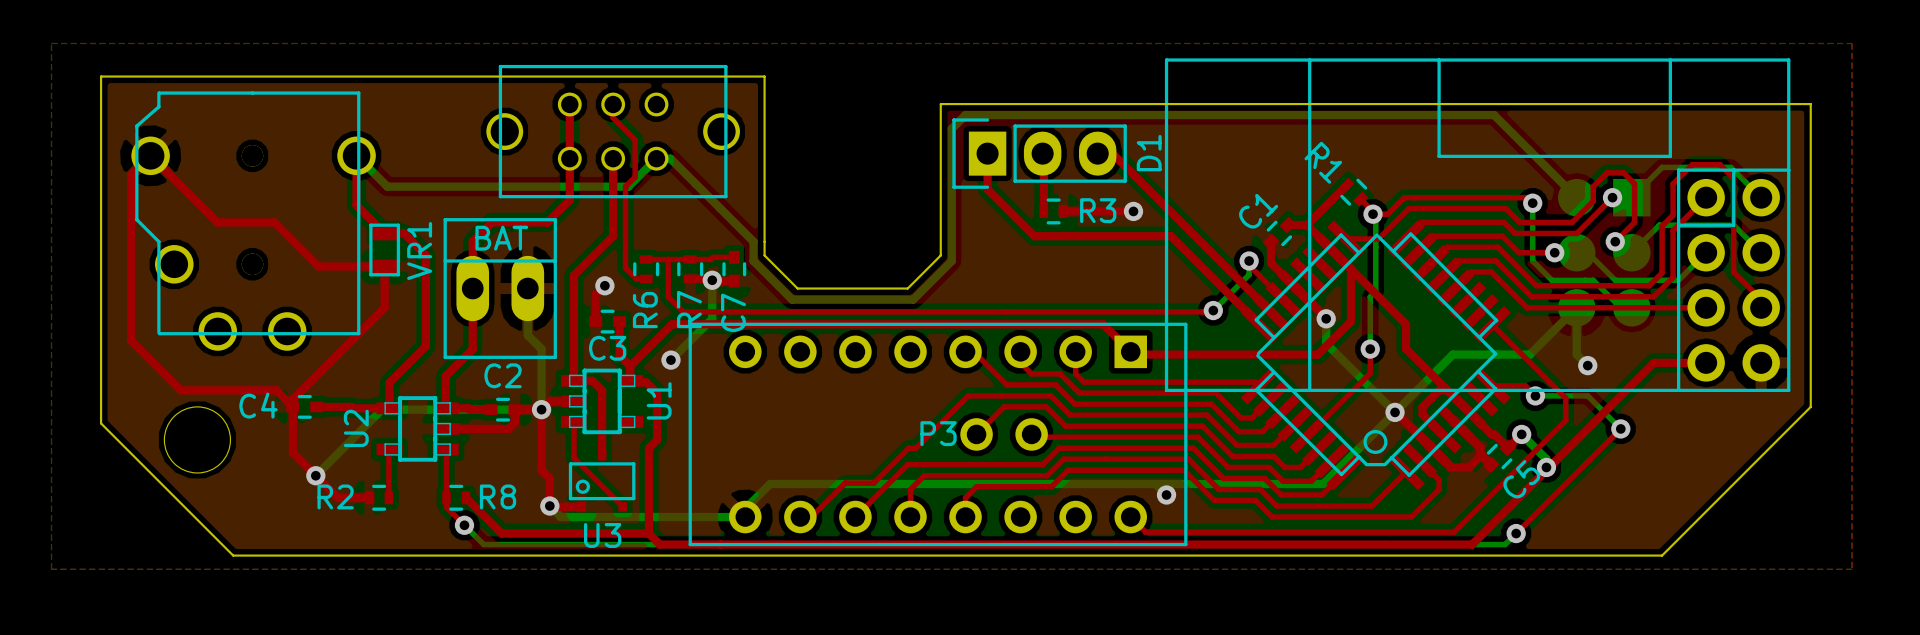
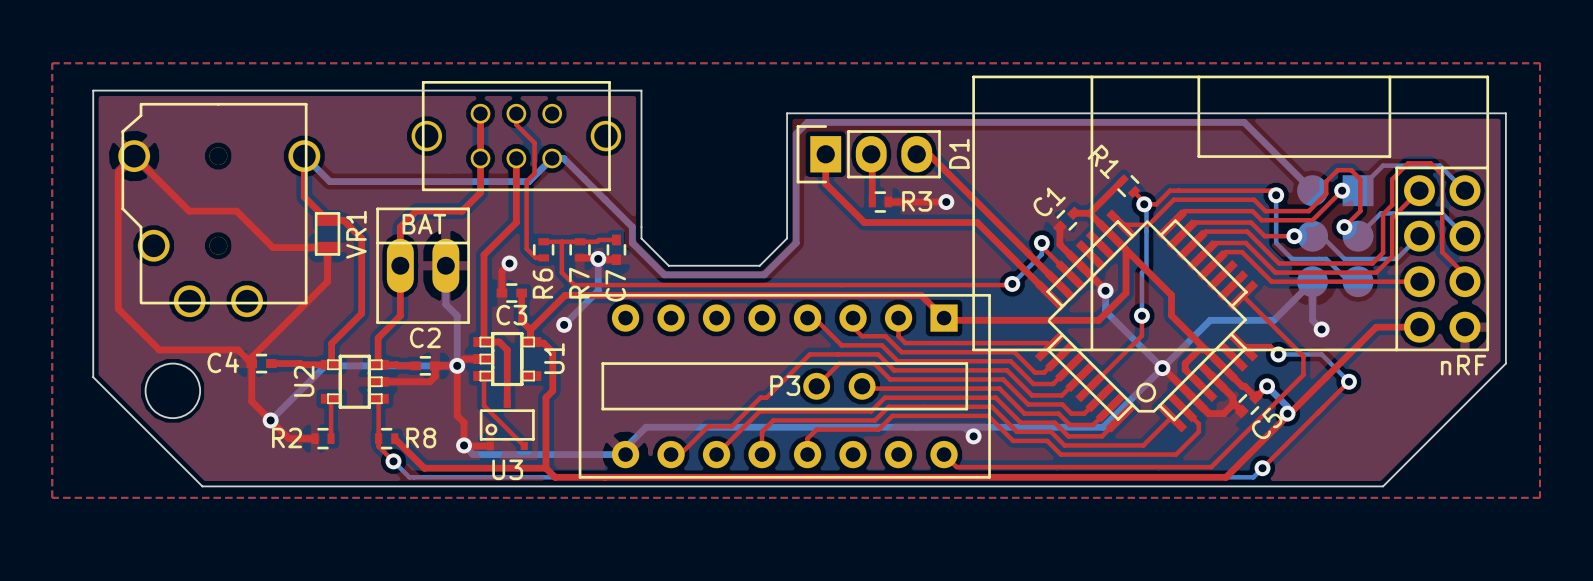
P3 footprint: [688, 322, 1188, 547] -> [578, 293, 991, 479]
part value: none -> nRF (1463, 365)

